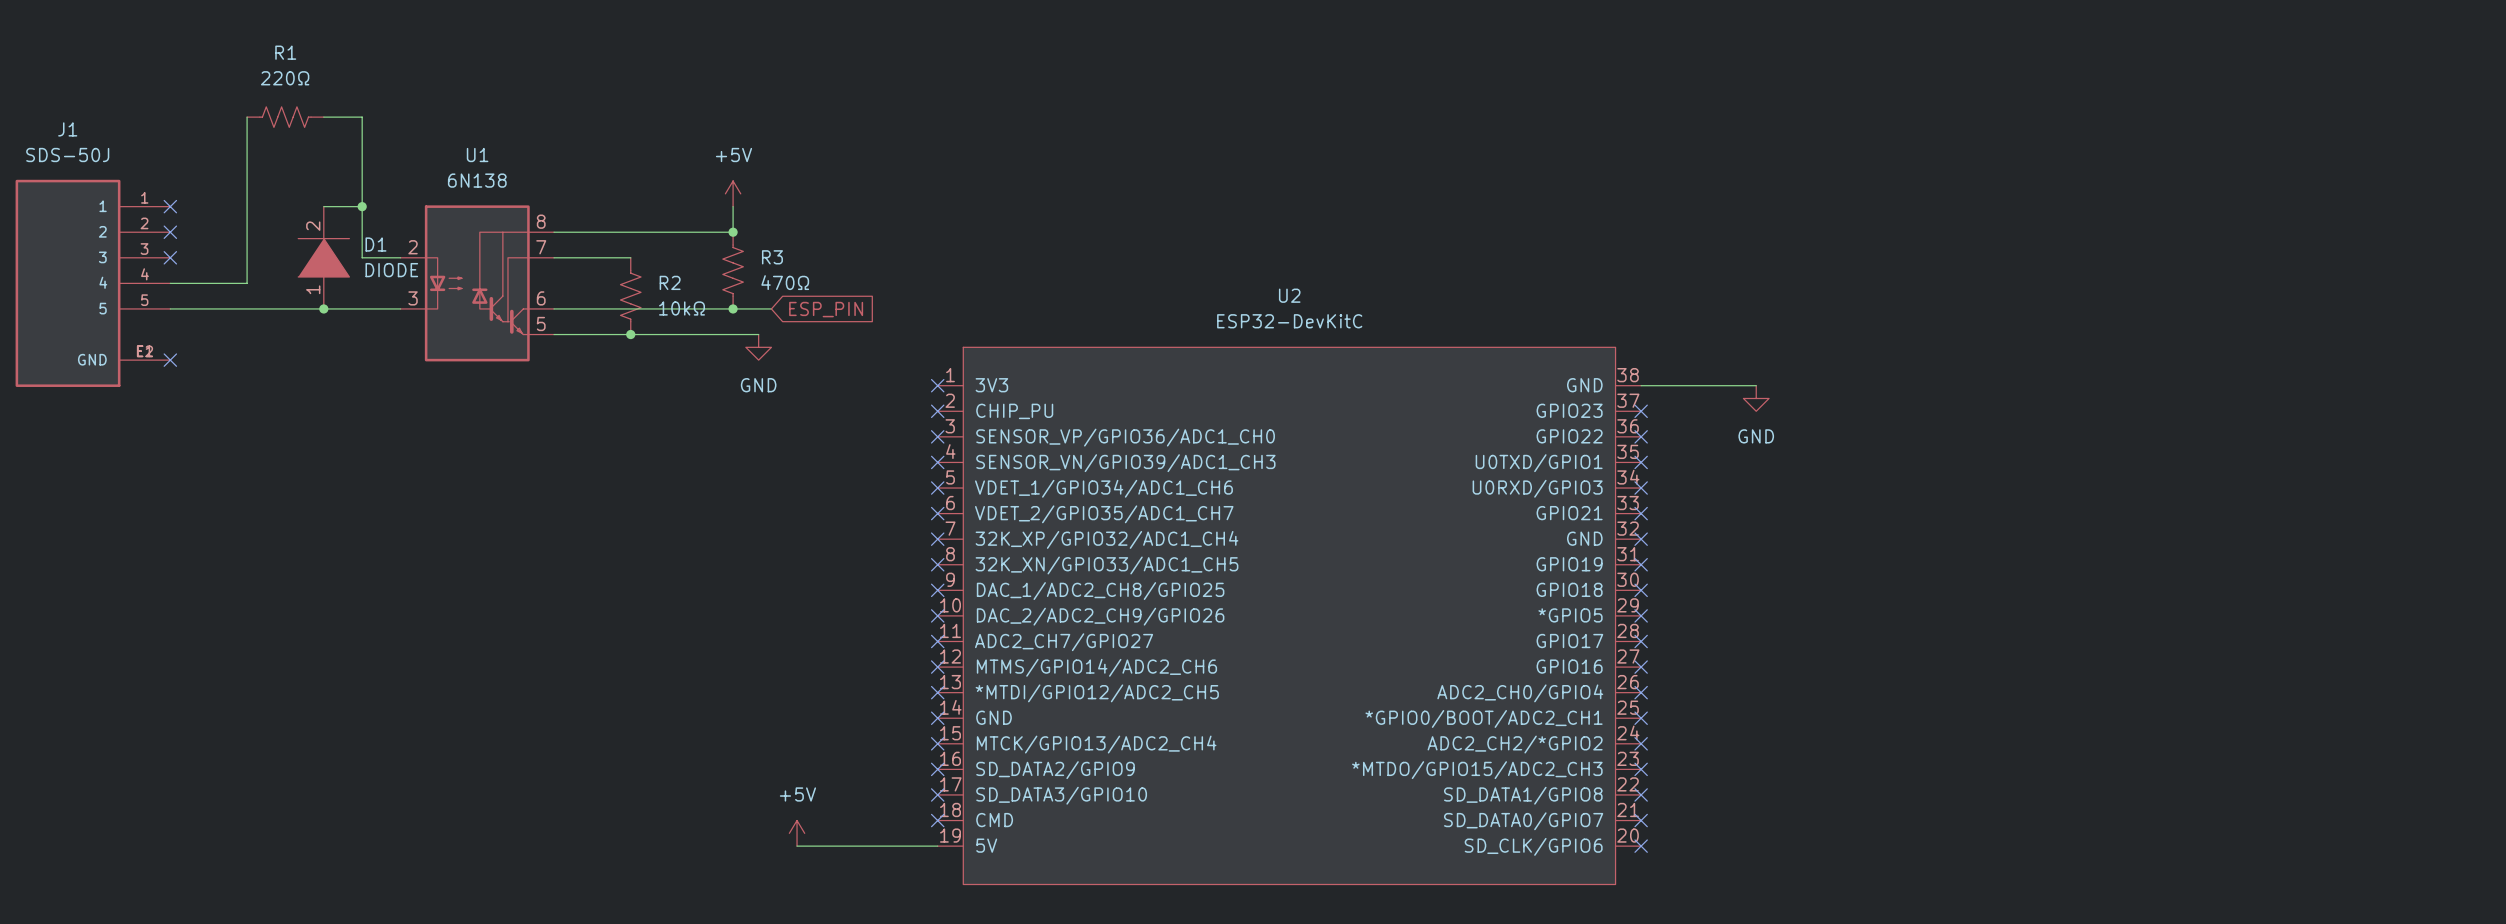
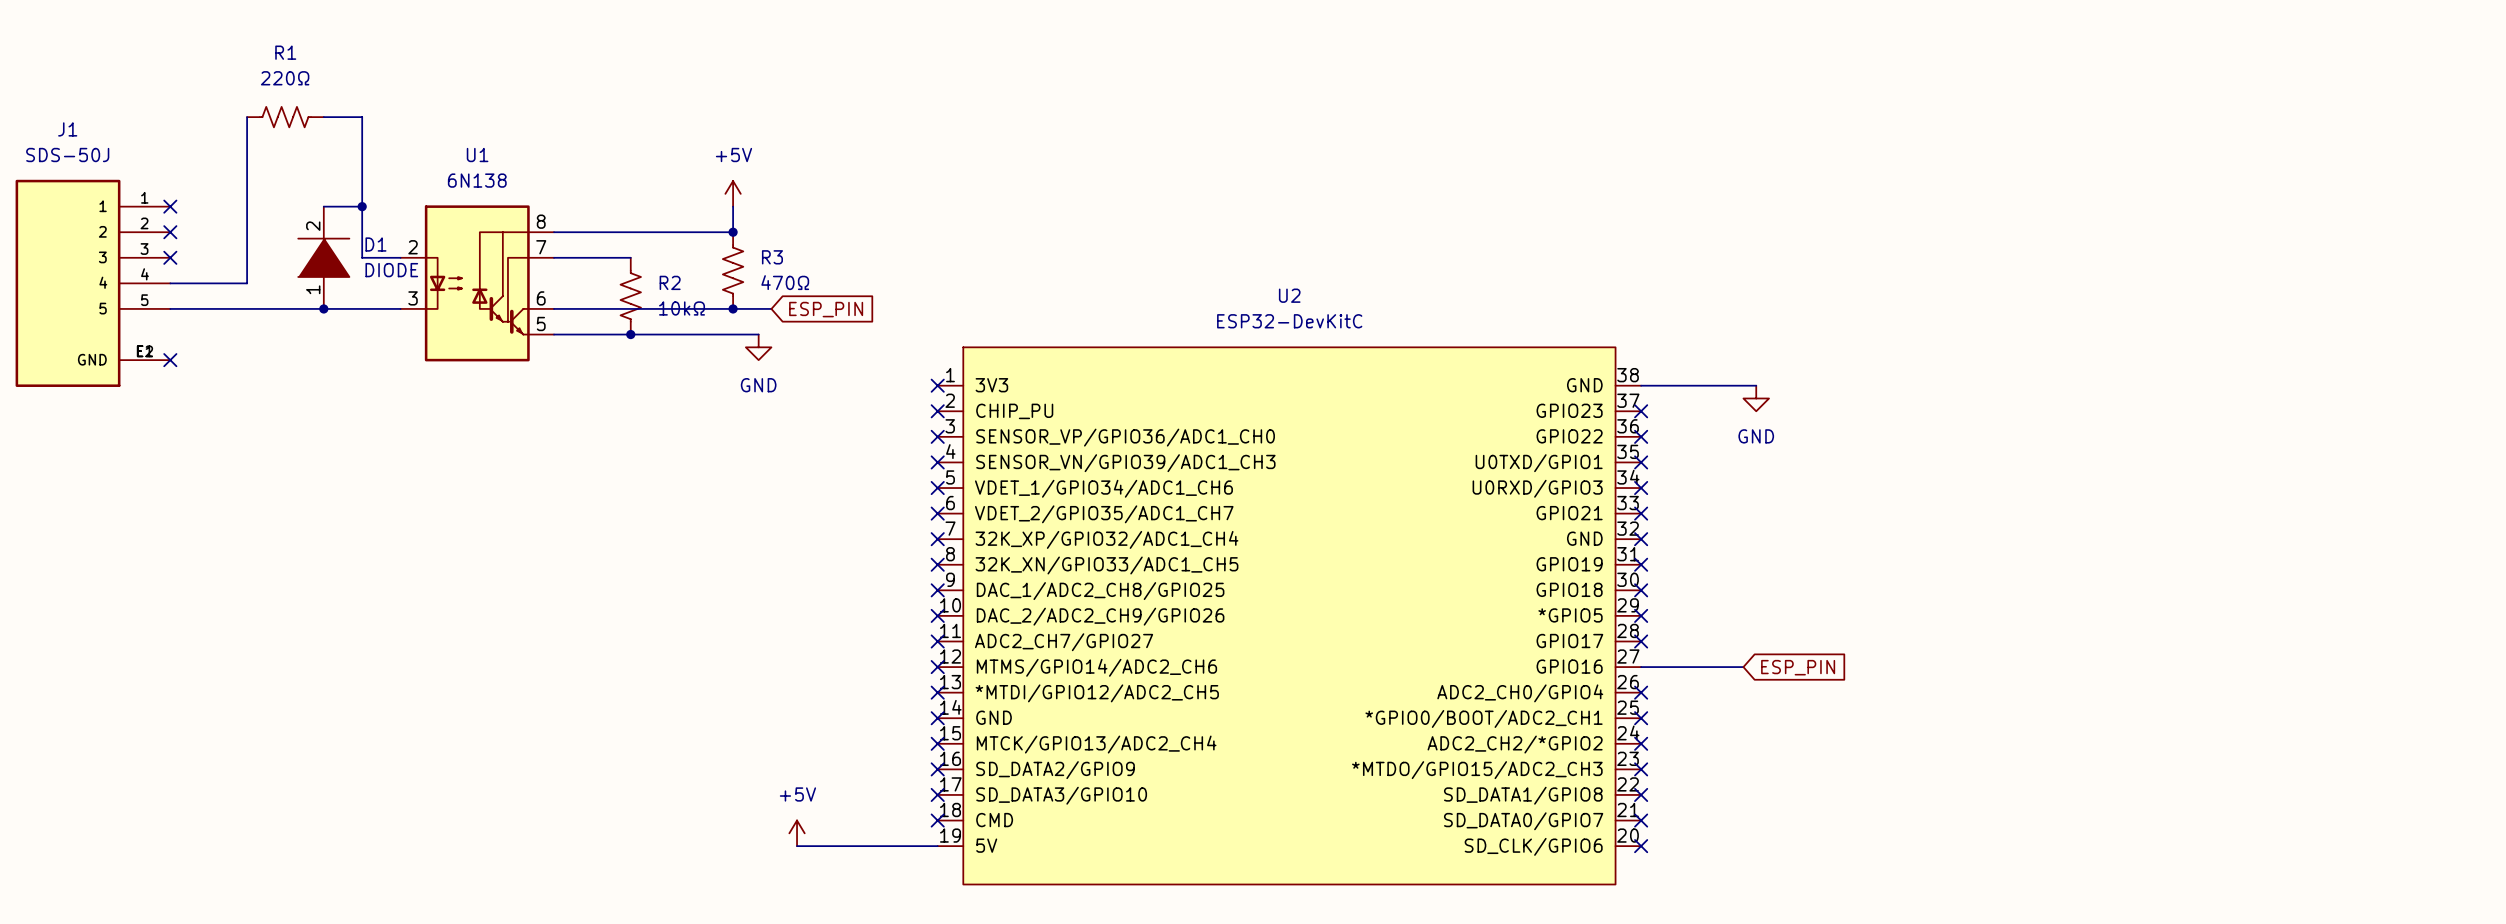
wire: none -> (1641, 667) (1743, 667)
no-connect mark: (1641, 667) -> none
global label: none -> ESP_PIN (1798, 667)

